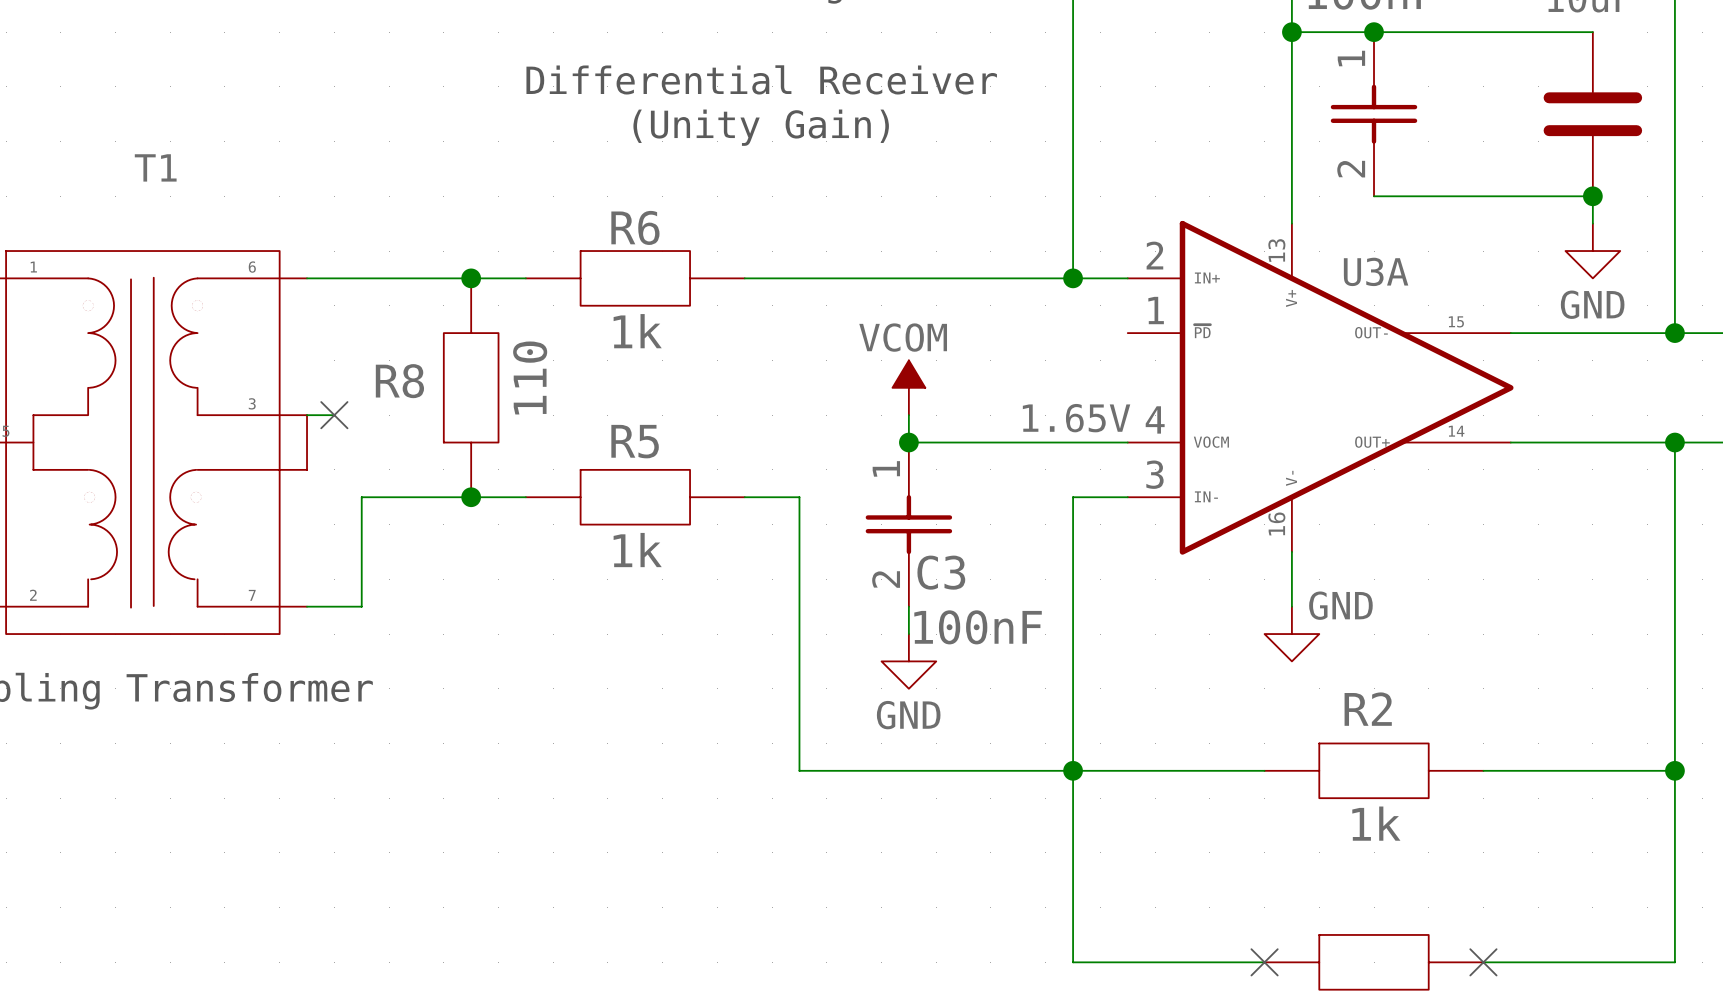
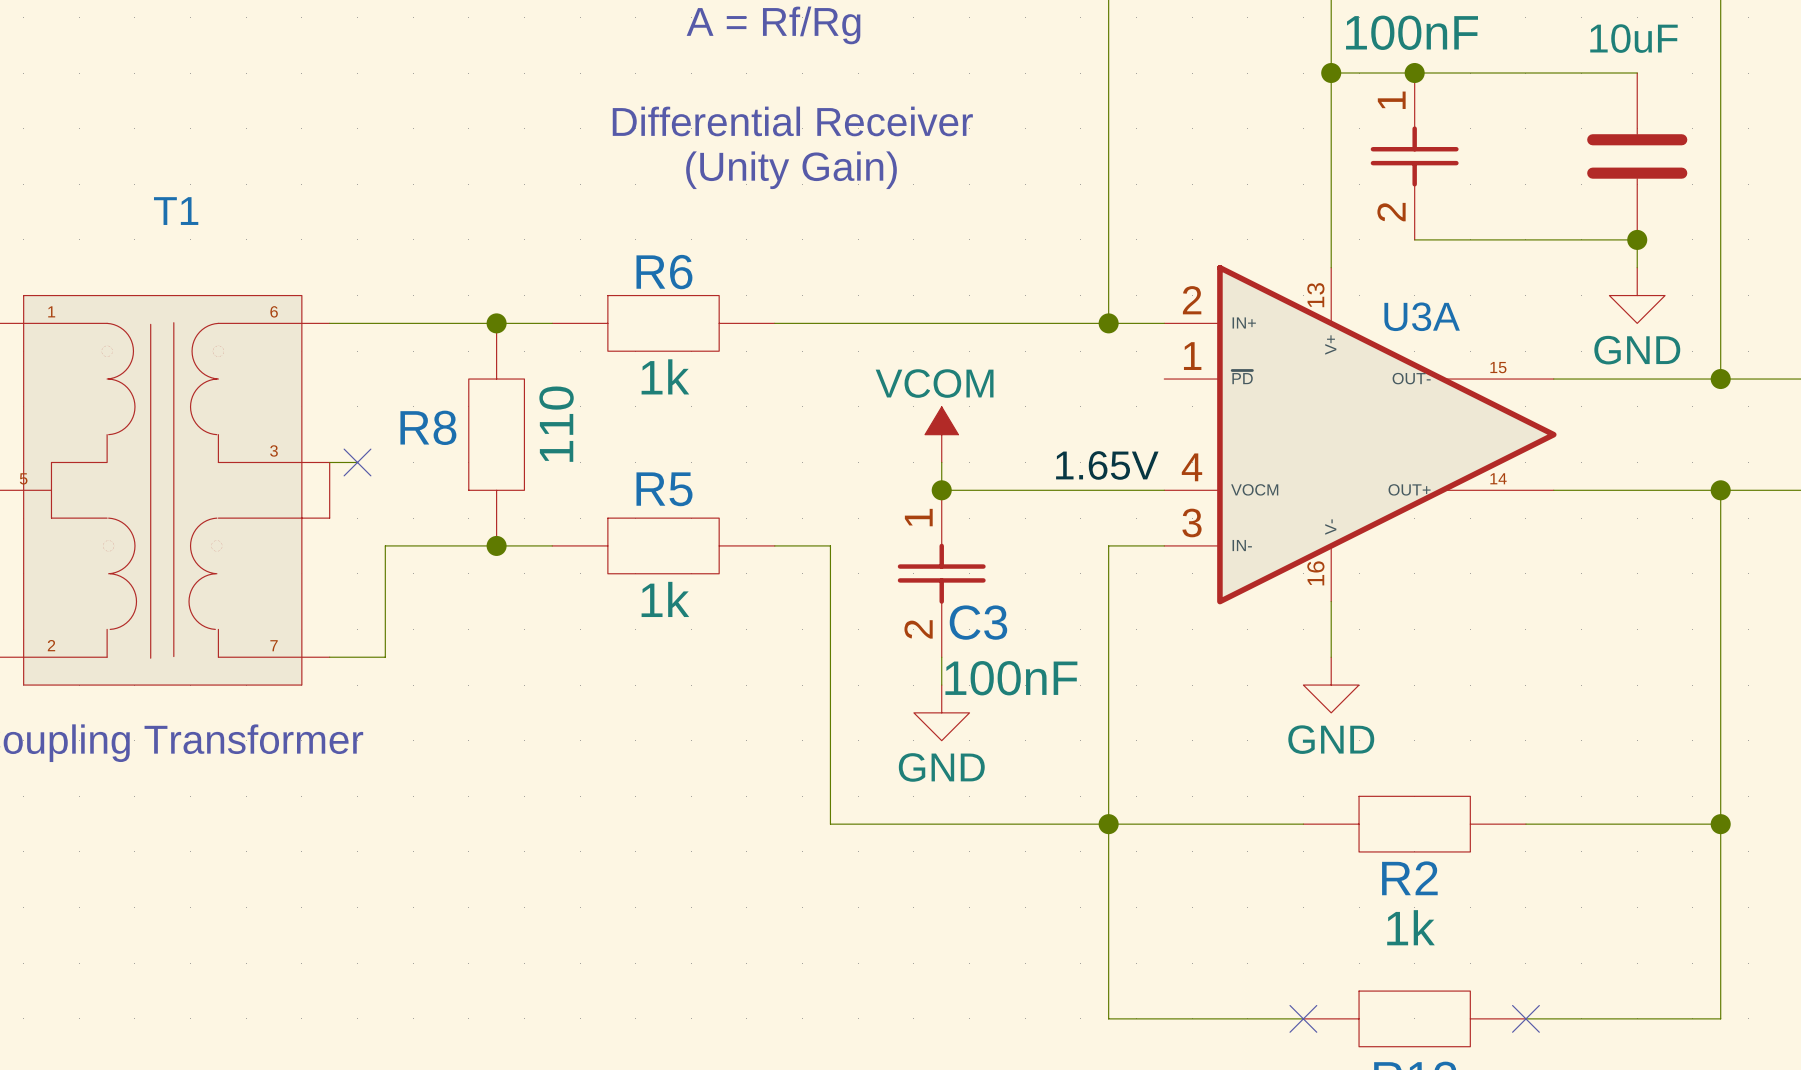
power symbol text position: GND (1340, 605) -> GND (1331, 739)
R2 name position: R2 (1368, 709) -> R2 (1409, 878)
R2 value position: 1k (1376, 823) -> 1k (1410, 927)

